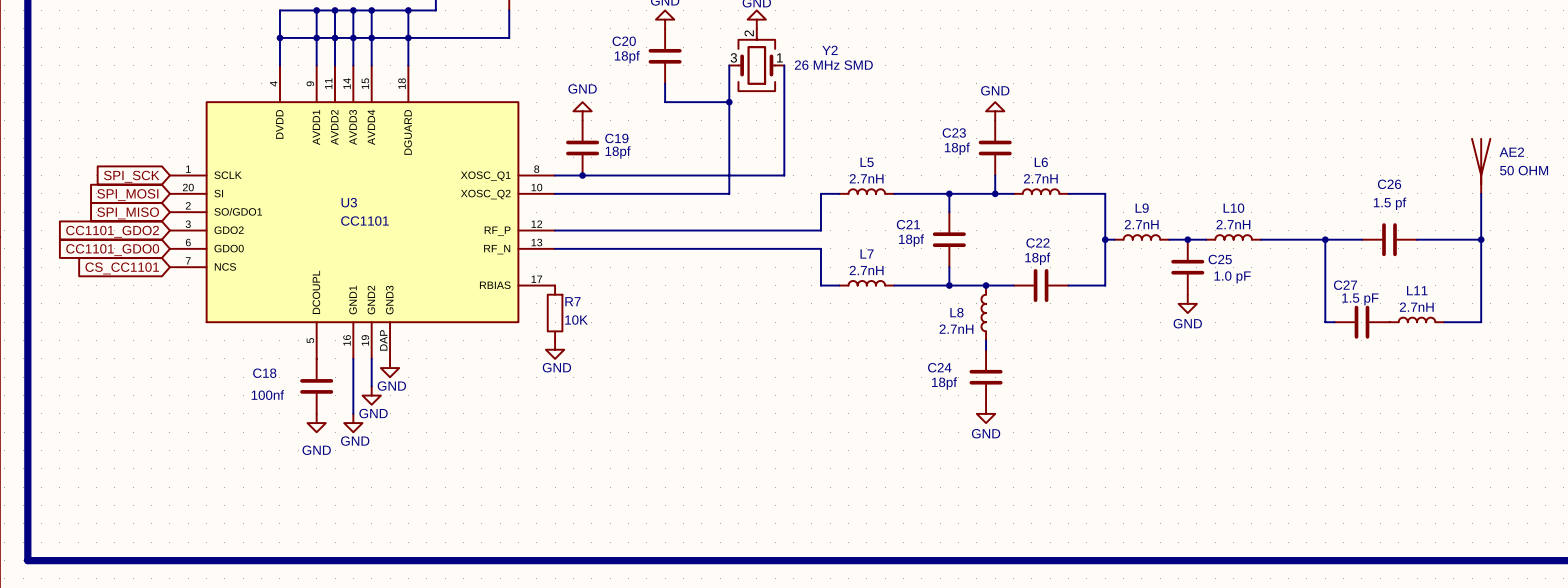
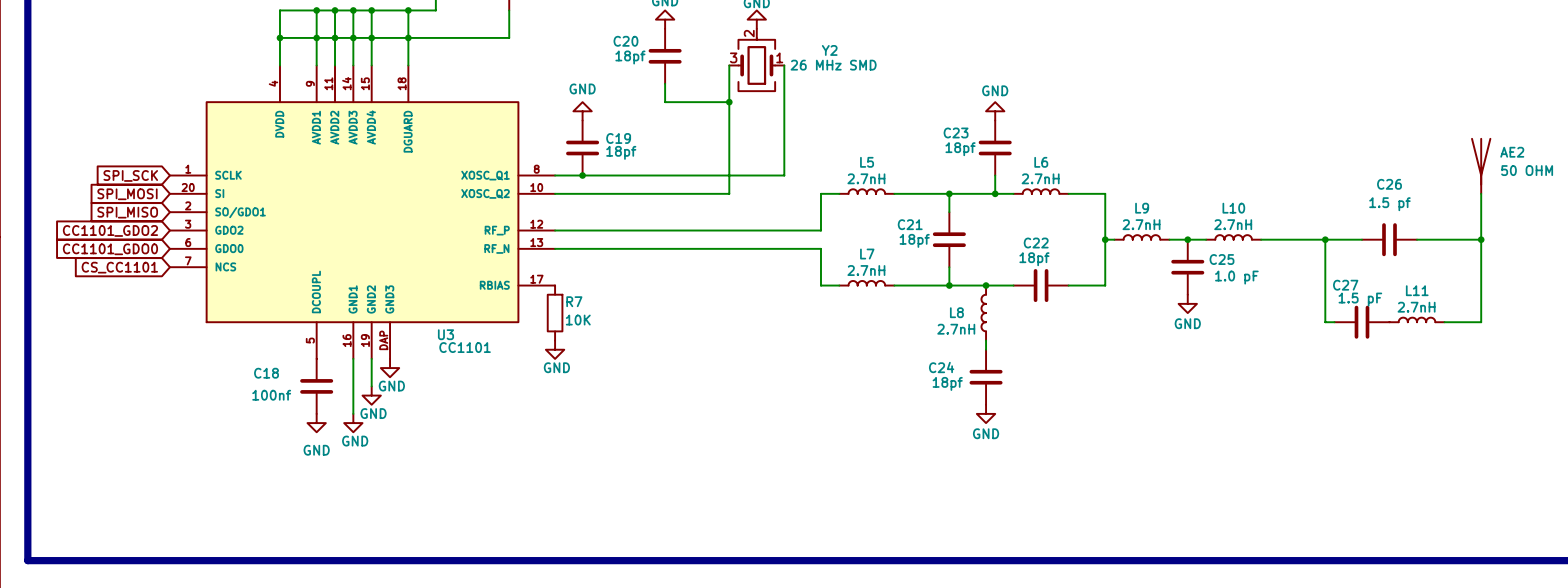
U3 name position: U3 (349, 202) -> U3 (445, 334)
U3 value position: CC1101 (364, 221) -> CC1101 (465, 347)

